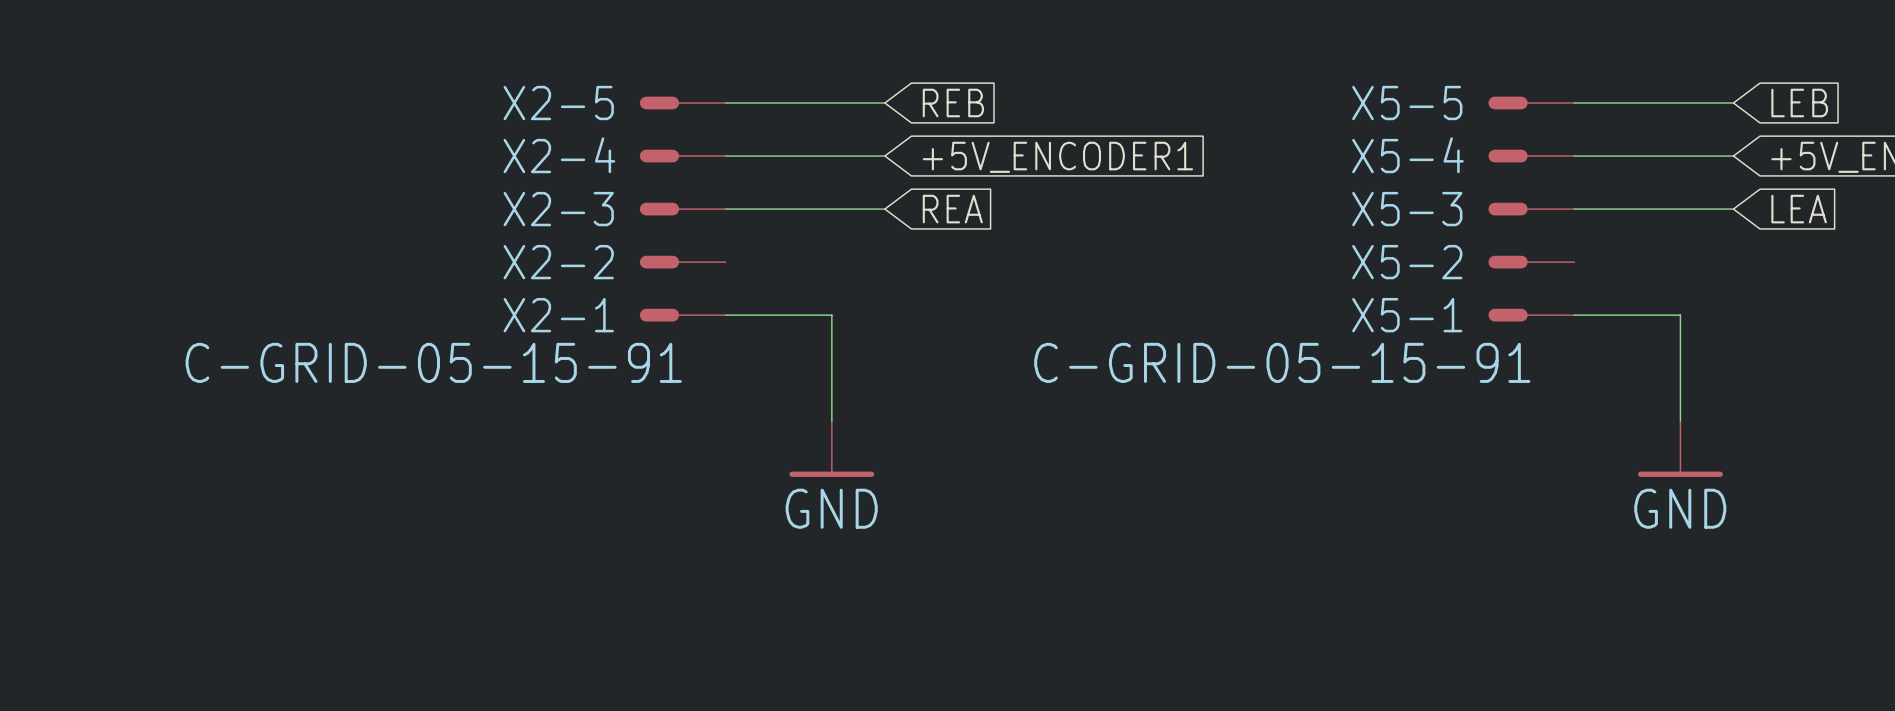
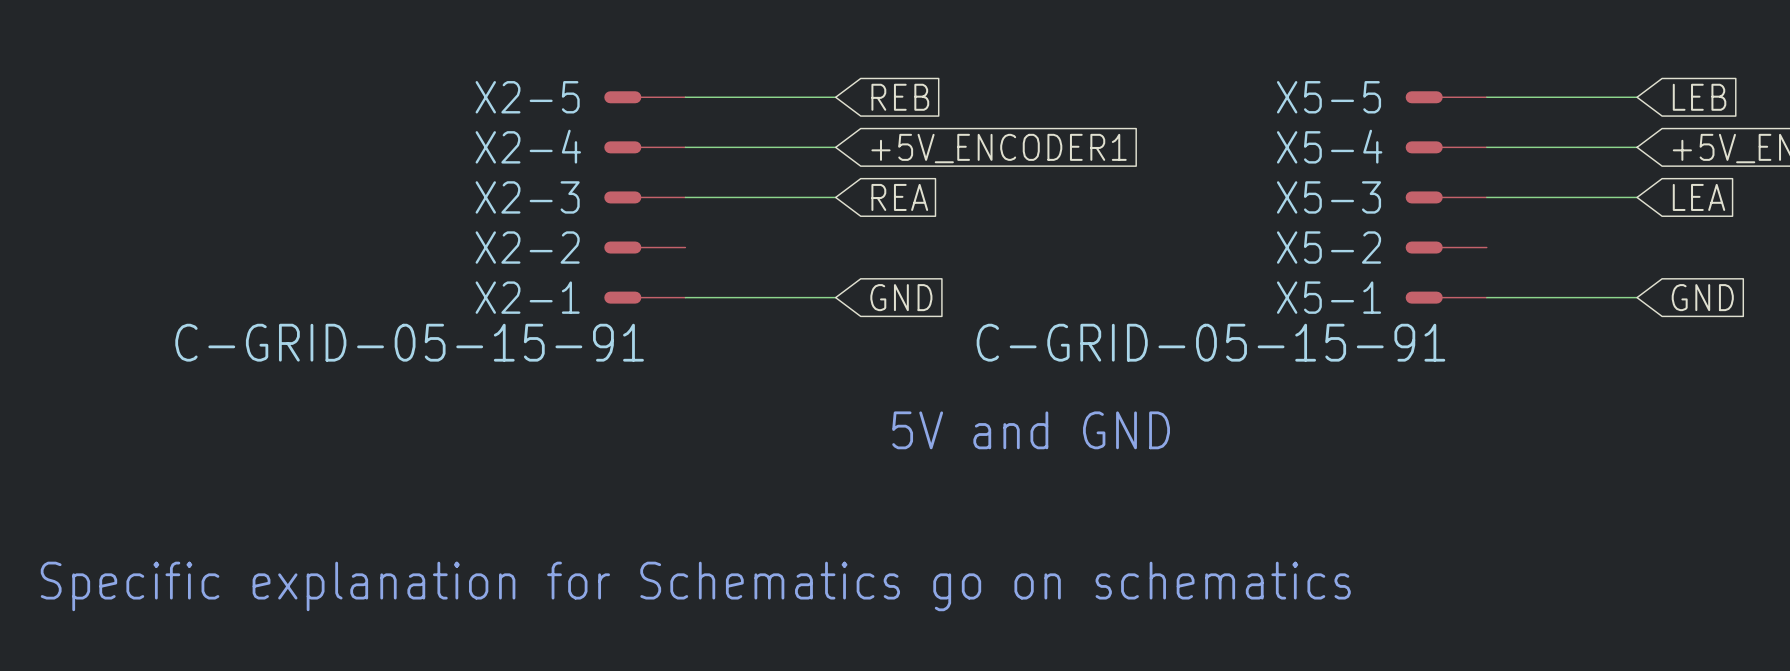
wire: (831, 315) (831, 421) -> (785, 297) (835, 297)
global label: none -> GND (901, 297)
wire: (1680, 315) (1680, 421) -> (1586, 297) (1637, 297)
global label: none -> GND (1702, 297)
power symbol: GND (831, 449) -> none
power symbol: GND (1680, 449) -> none
text: none -> 5V and GND (1031, 430)
text: none -> Specific explanation for Schematics go on schematics (695, 586)

